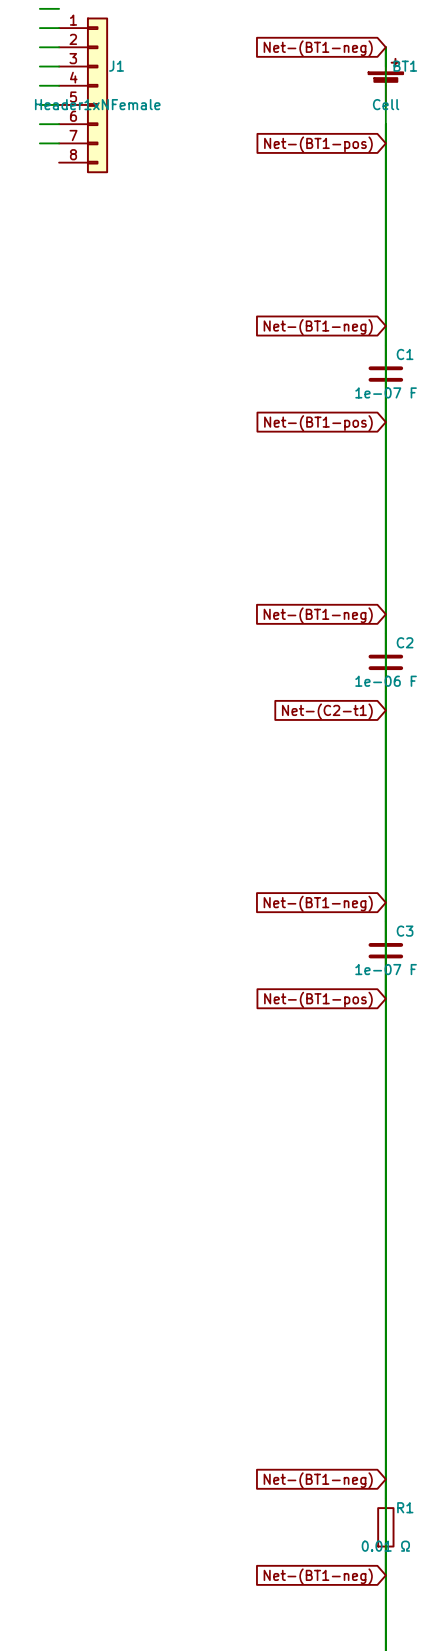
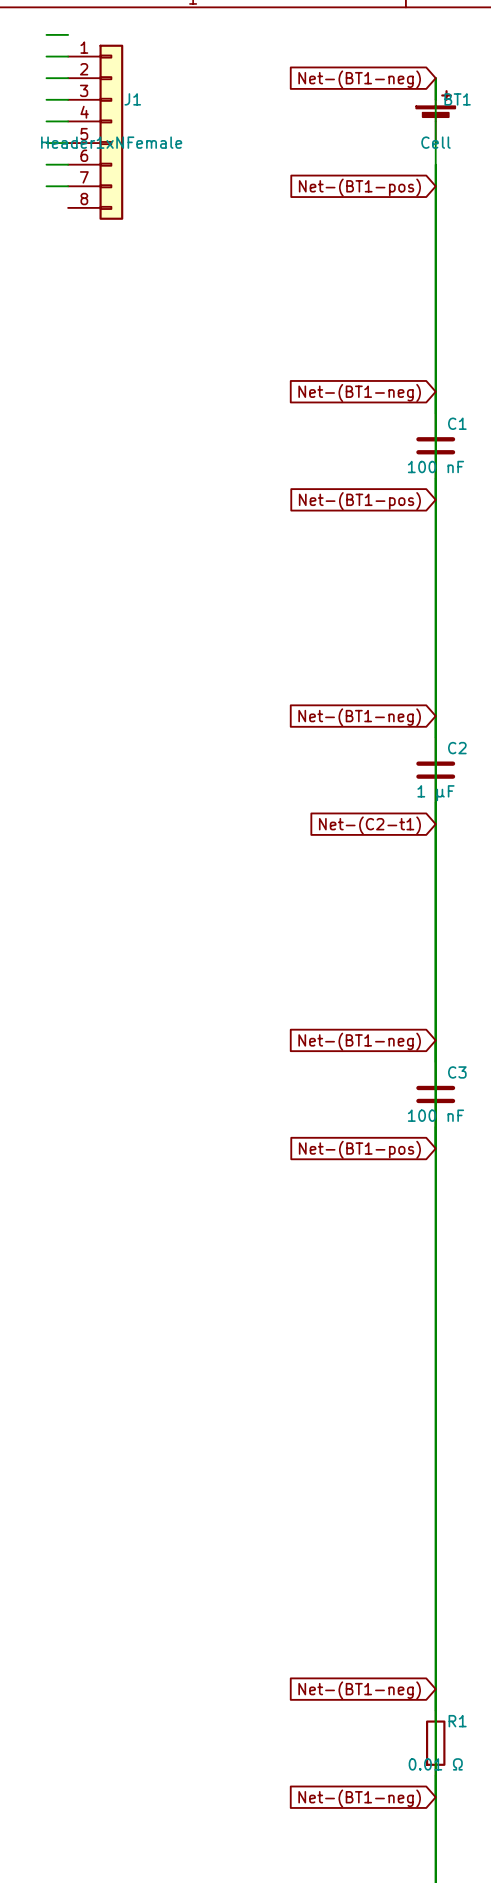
C1 value: 1e-07 F (386, 392) -> 100 nF (435, 467)
C2 value: 1e-06 F (386, 681) -> 1 µF (435, 793)
C3 value: 1e-07 F (386, 969) -> 100 nF (435, 1115)

